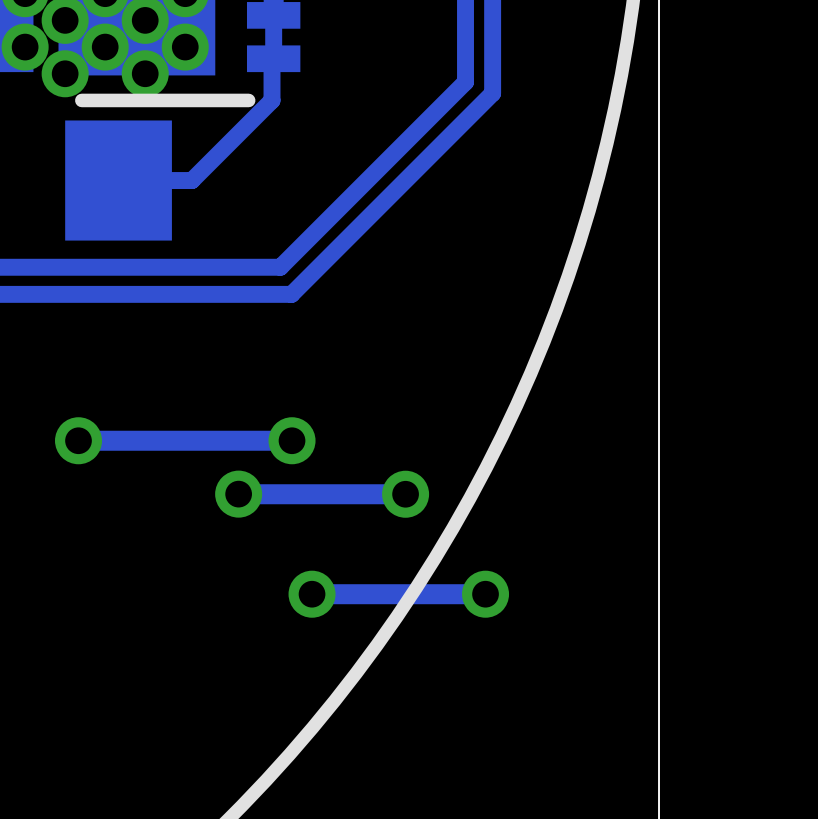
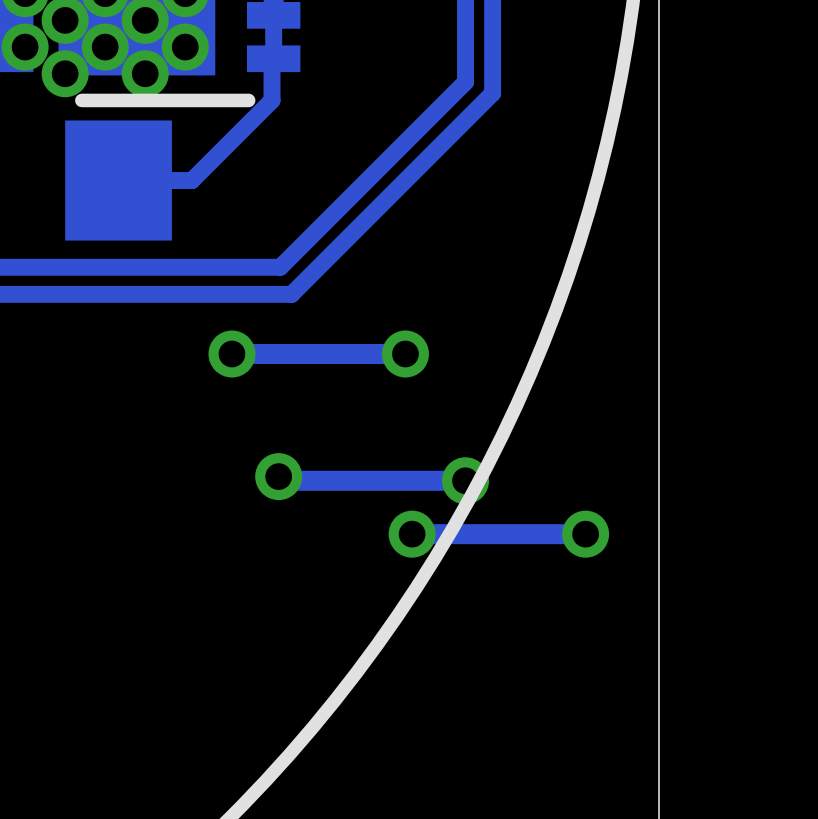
via: none -> (231, 354)
track: none -> (405, 354) (231, 354)
via: none -> (405, 354)
via: (78, 440) -> none
track: (292, 440) (78, 440) -> none
via: (292, 440) -> none
track: none -> (278, 476) (282, 480) (465, 480)
via: none -> (278, 476)
via: none -> (465, 480)
via: (238, 494) -> none
track: (405, 494) (238, 494) -> none
via position: (405, 494) -> (412, 534)
via: none -> (585, 534)
via: (312, 594) -> none
track: (485, 594) (312, 594) -> (585, 534) (412, 534)
via: (485, 594) -> none

